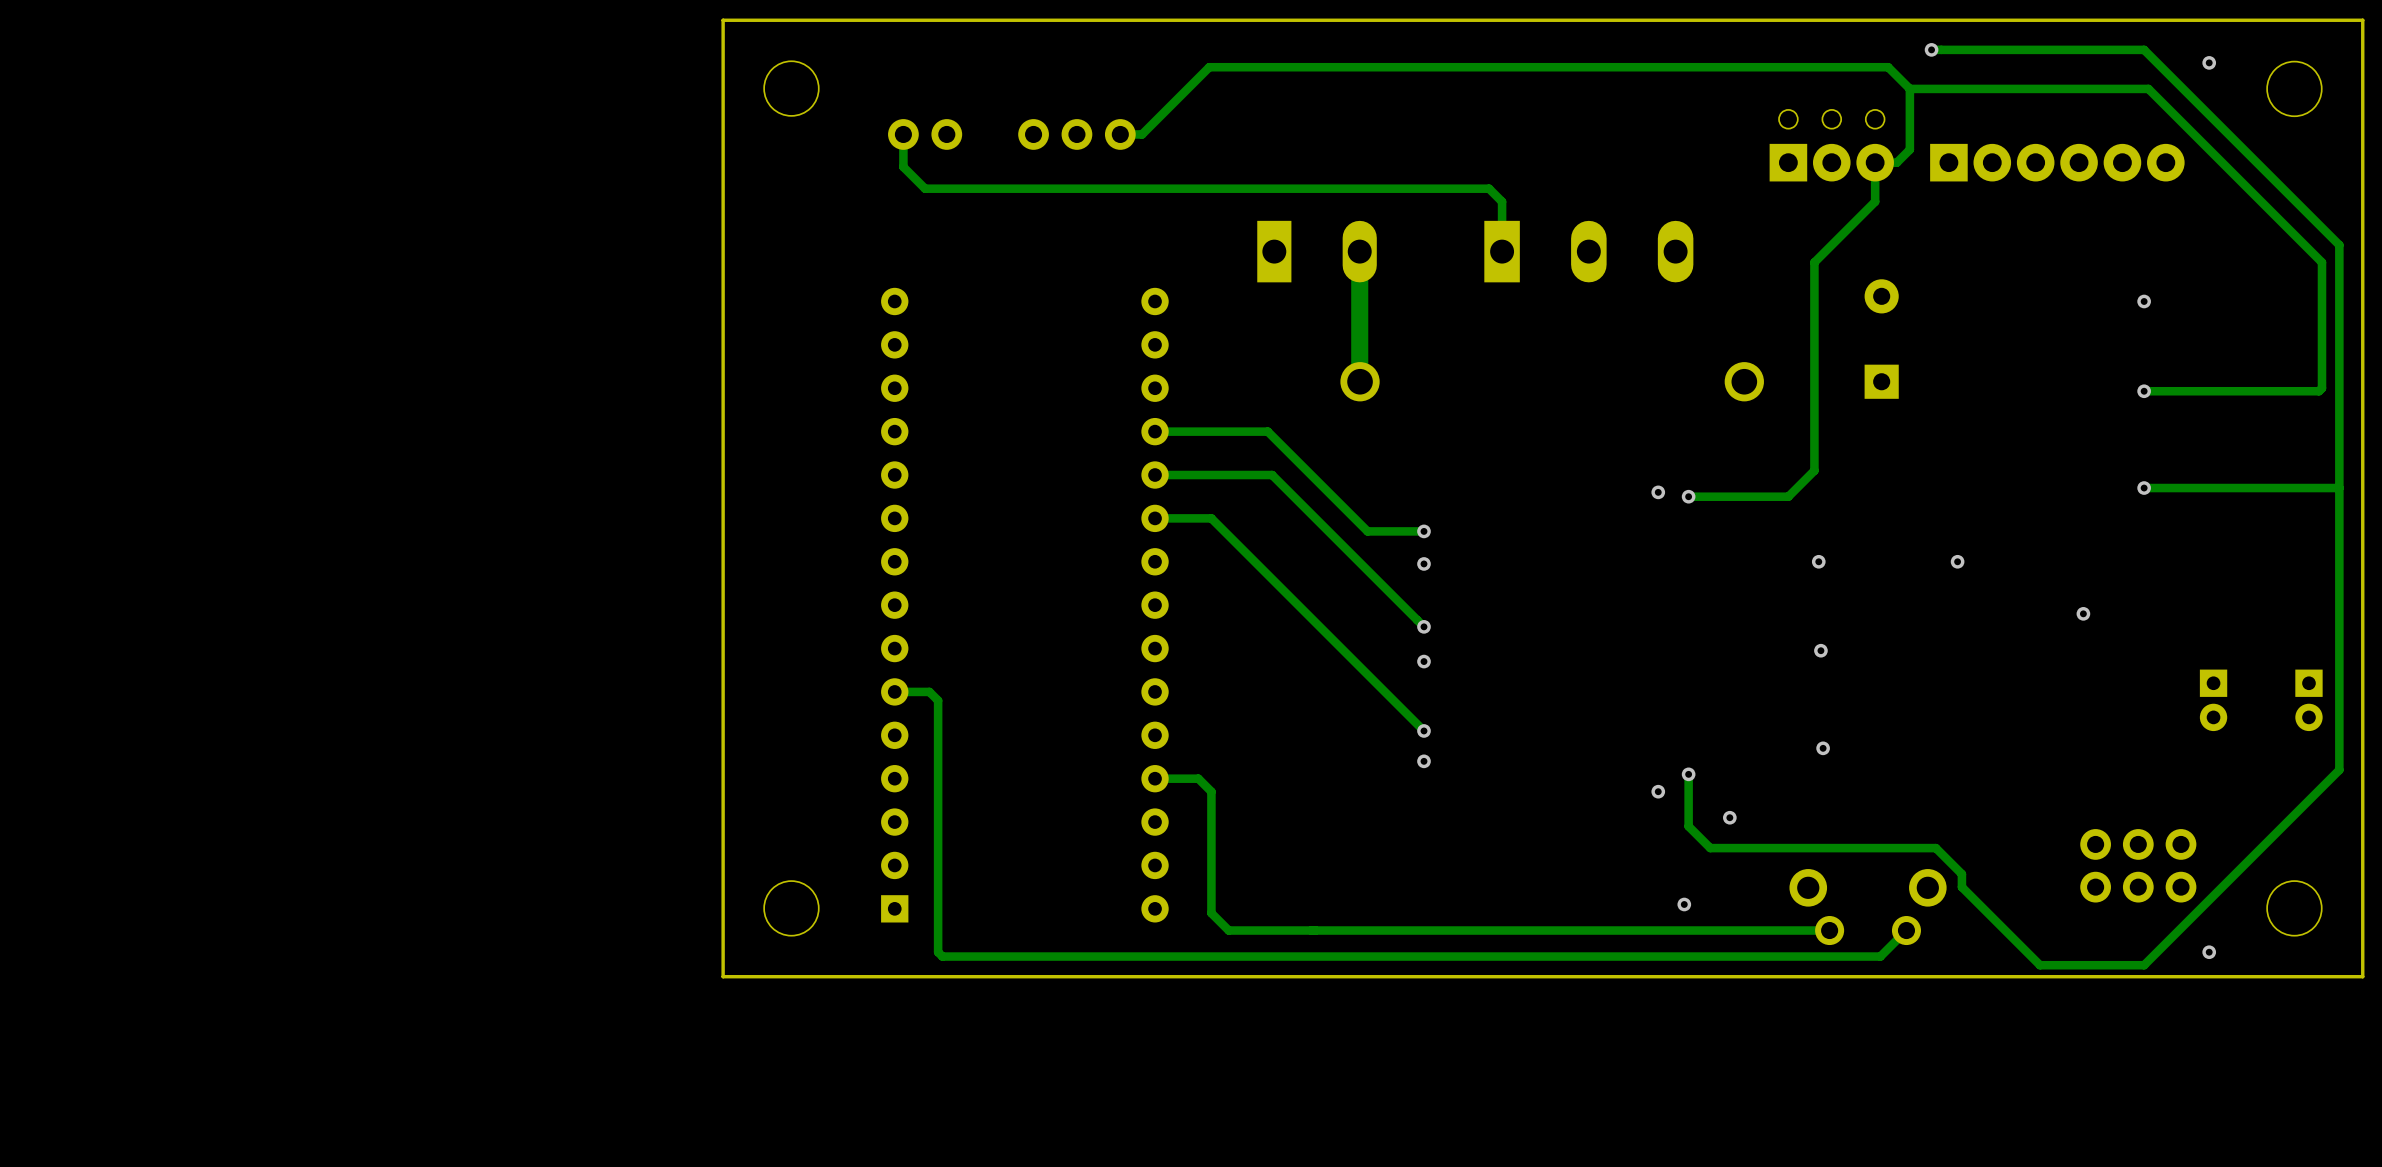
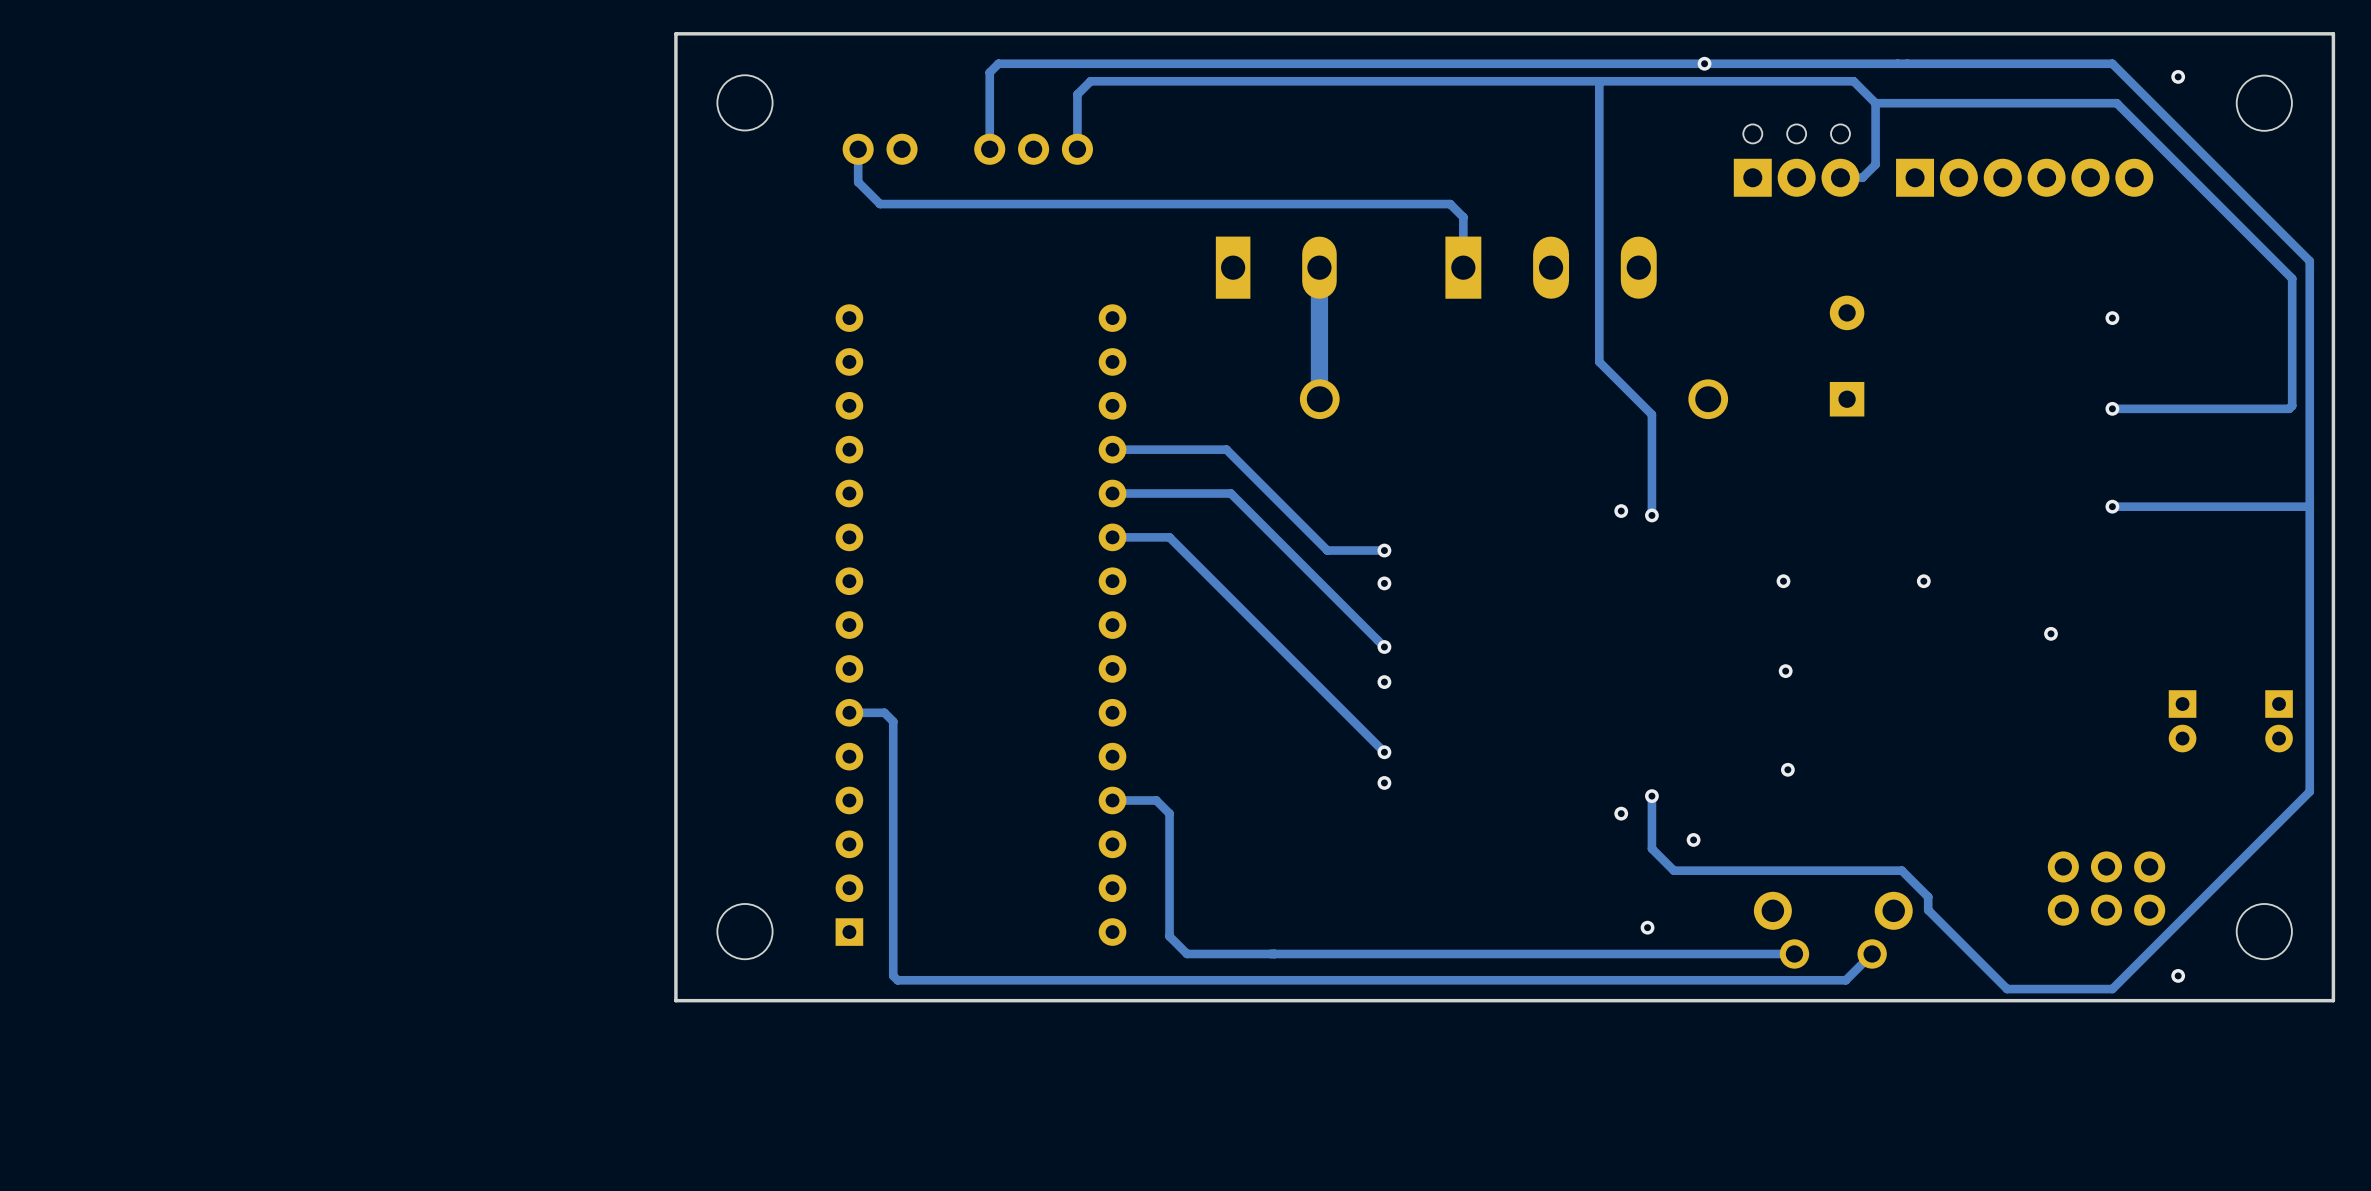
via: none -> (1704, 63)
track: none -> (1897, 63) (998, 63) (989, 72) (989, 149)
via: (1931, 49) -> none
track: (1209, 67) (1142, 134) (1120, 134) -> (1167, 81) (1090, 81) (1077, 94) (1077, 149)
track: (1875, 162) (1875, 201) (1814, 262) (1814, 470) (1788, 496) (1688, 496) -> (1599, 81) (1599, 361) (1651, 414) (1651, 515)

